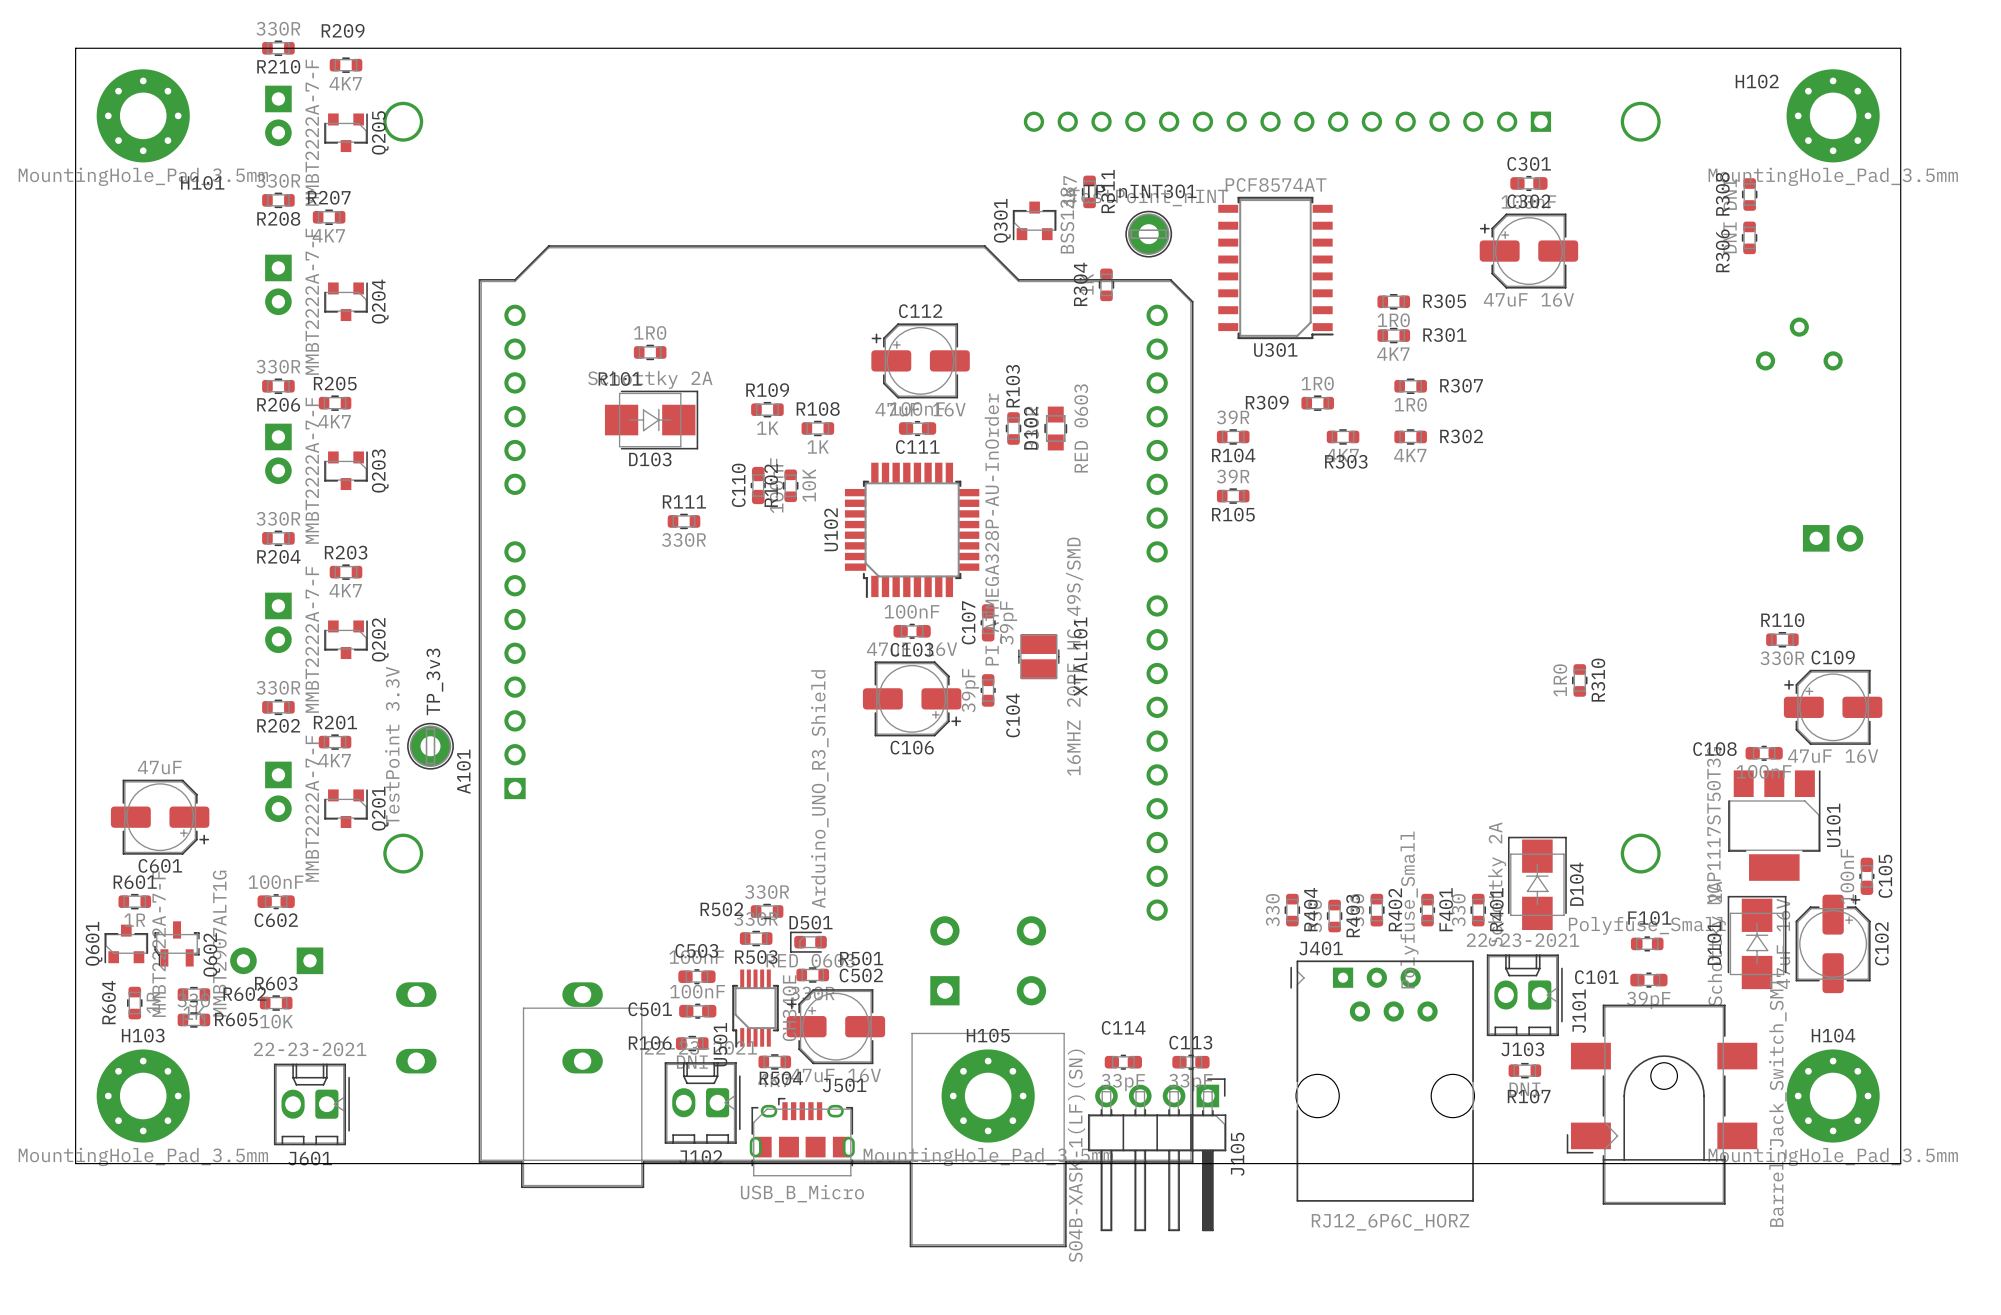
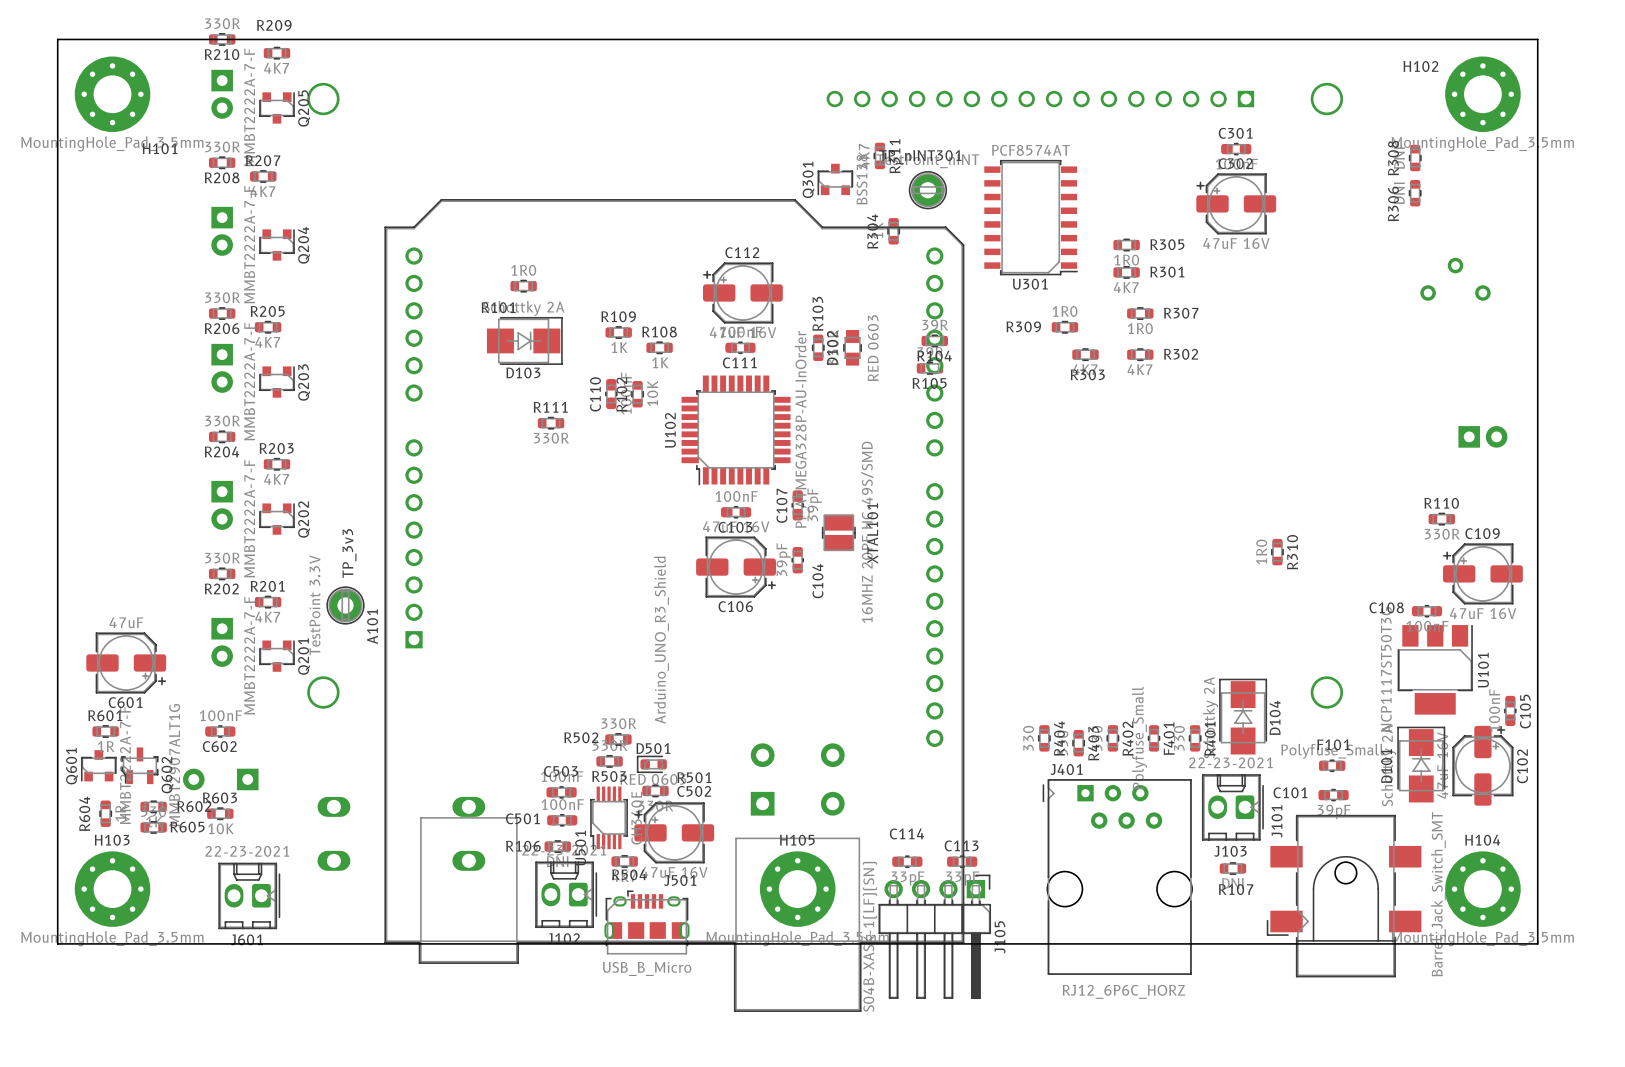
R104 position: (1233, 436) -> (934, 340)
R105 position: (1233, 496) -> (929, 368)

